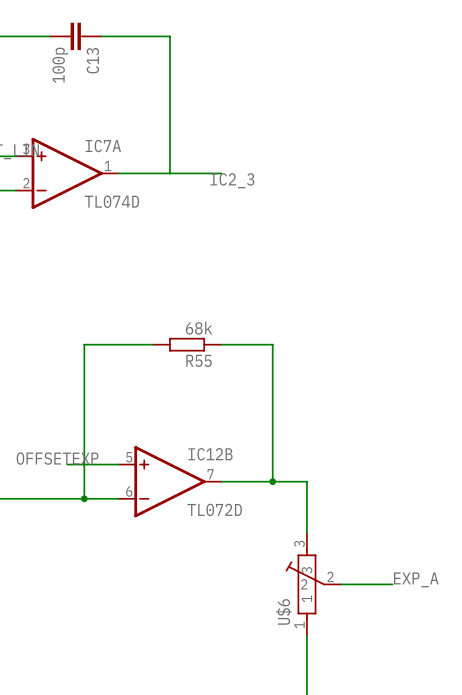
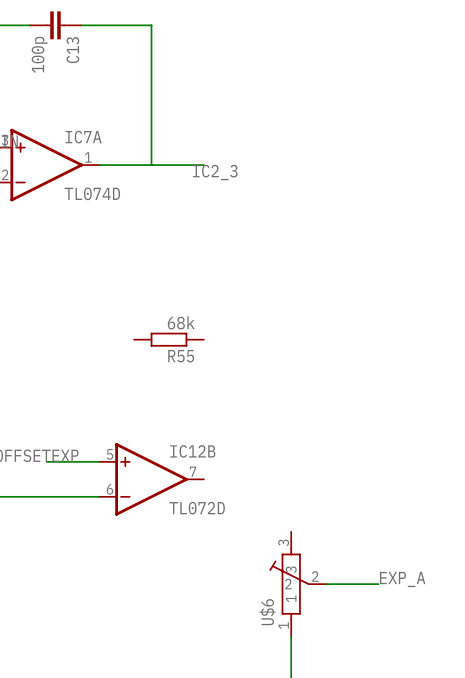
wire: (152, 344) (84, 344) (84, 498) -> none
wire: (221, 344) (272, 344) (272, 481) -> none
wire: (221, 481) (306, 481) (306, 533) -> none
junction: (272, 481) -> none
junction: (84, 498) -> none

